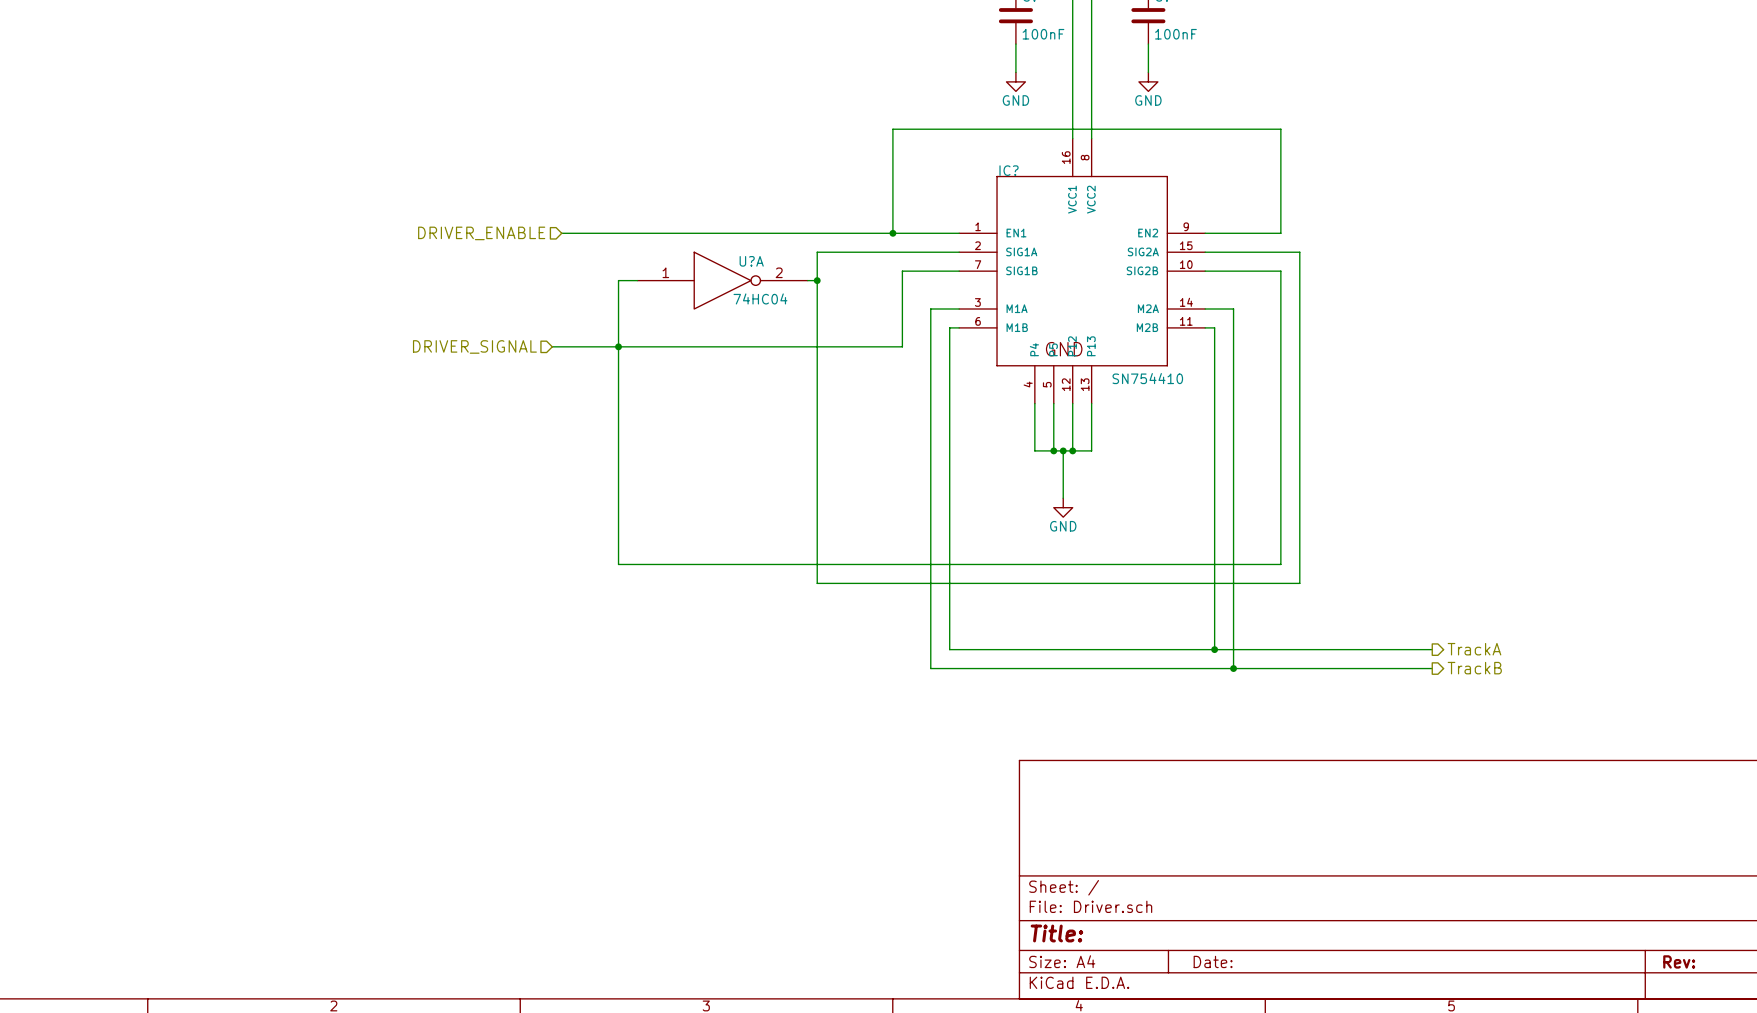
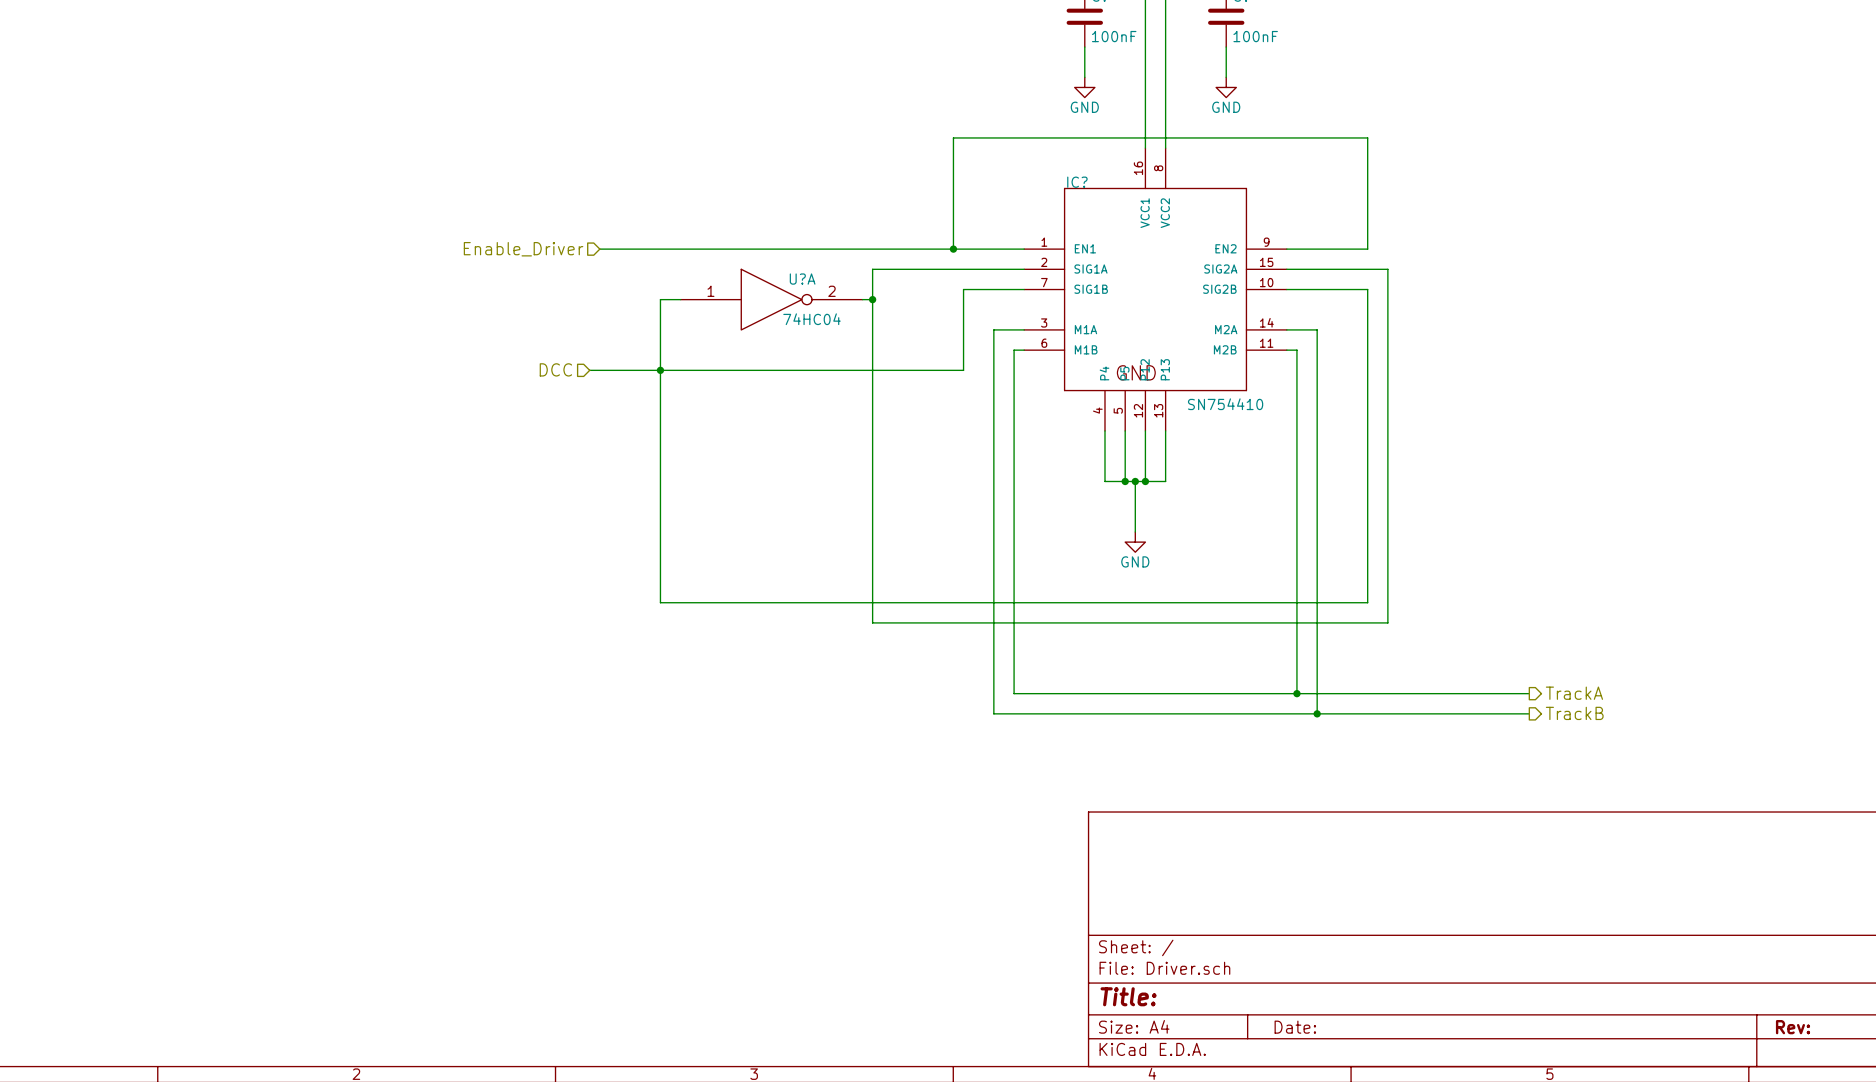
hierarchical label: DRIVER_ENABLE (481, 233) -> Enable_Driver (523, 249)
hierarchical label: DRIVER_SIGNAL (474, 346) -> DCC (555, 369)

